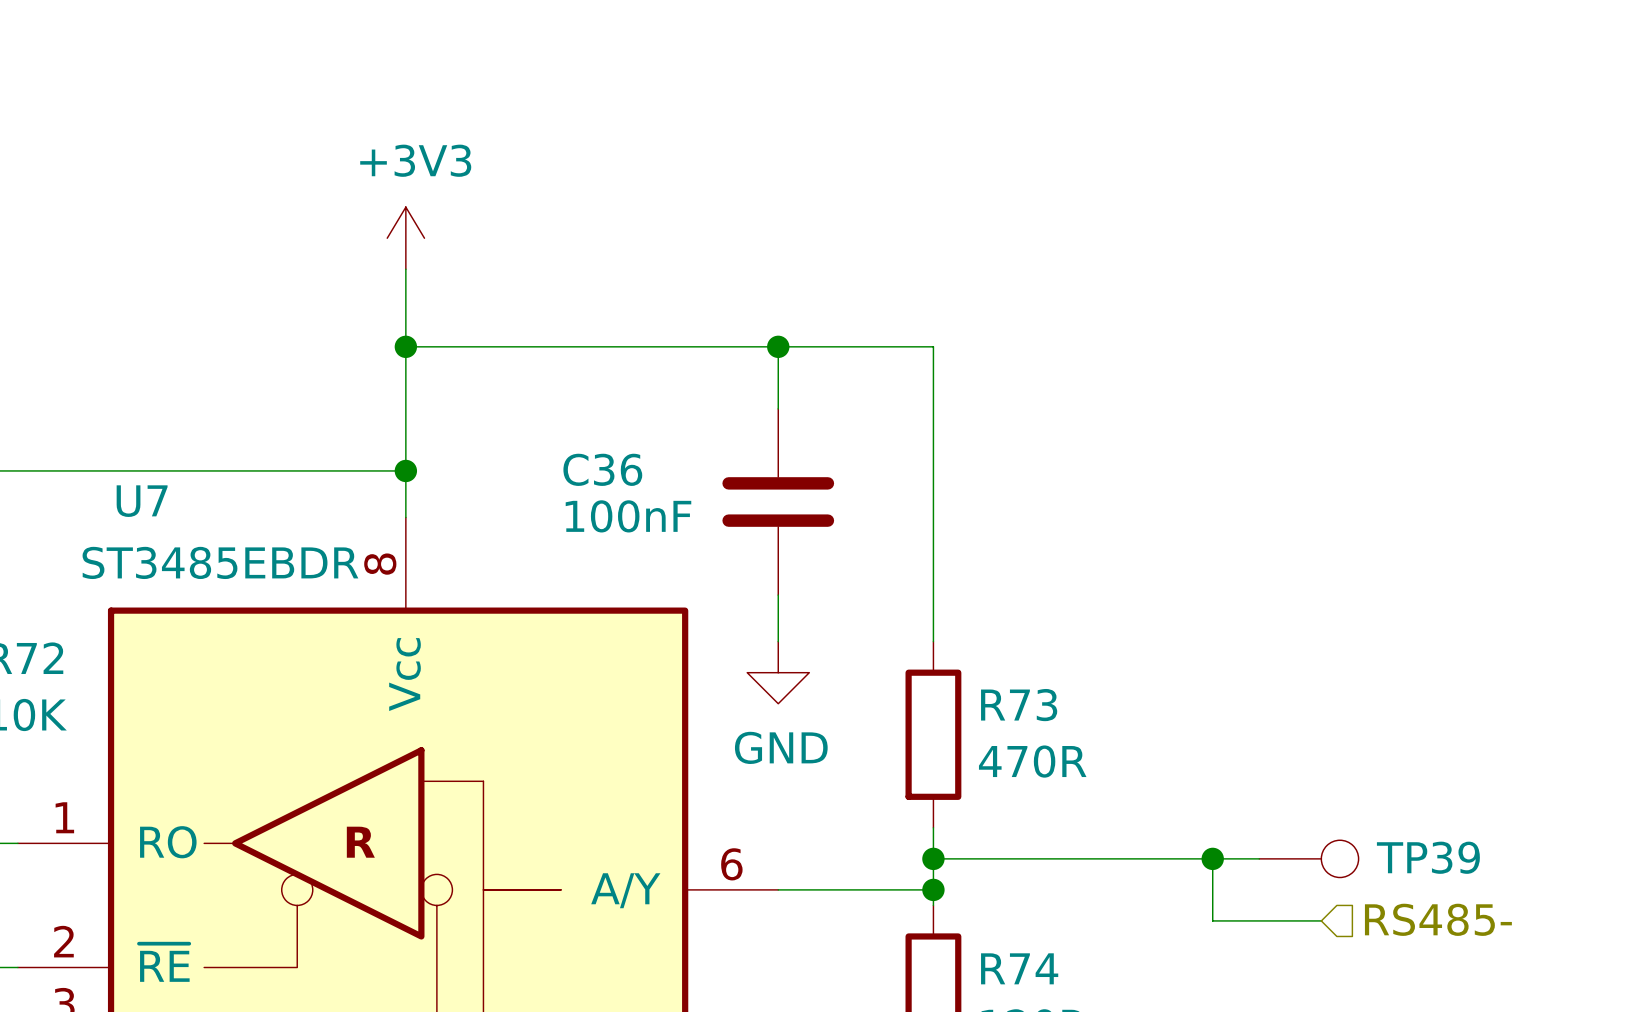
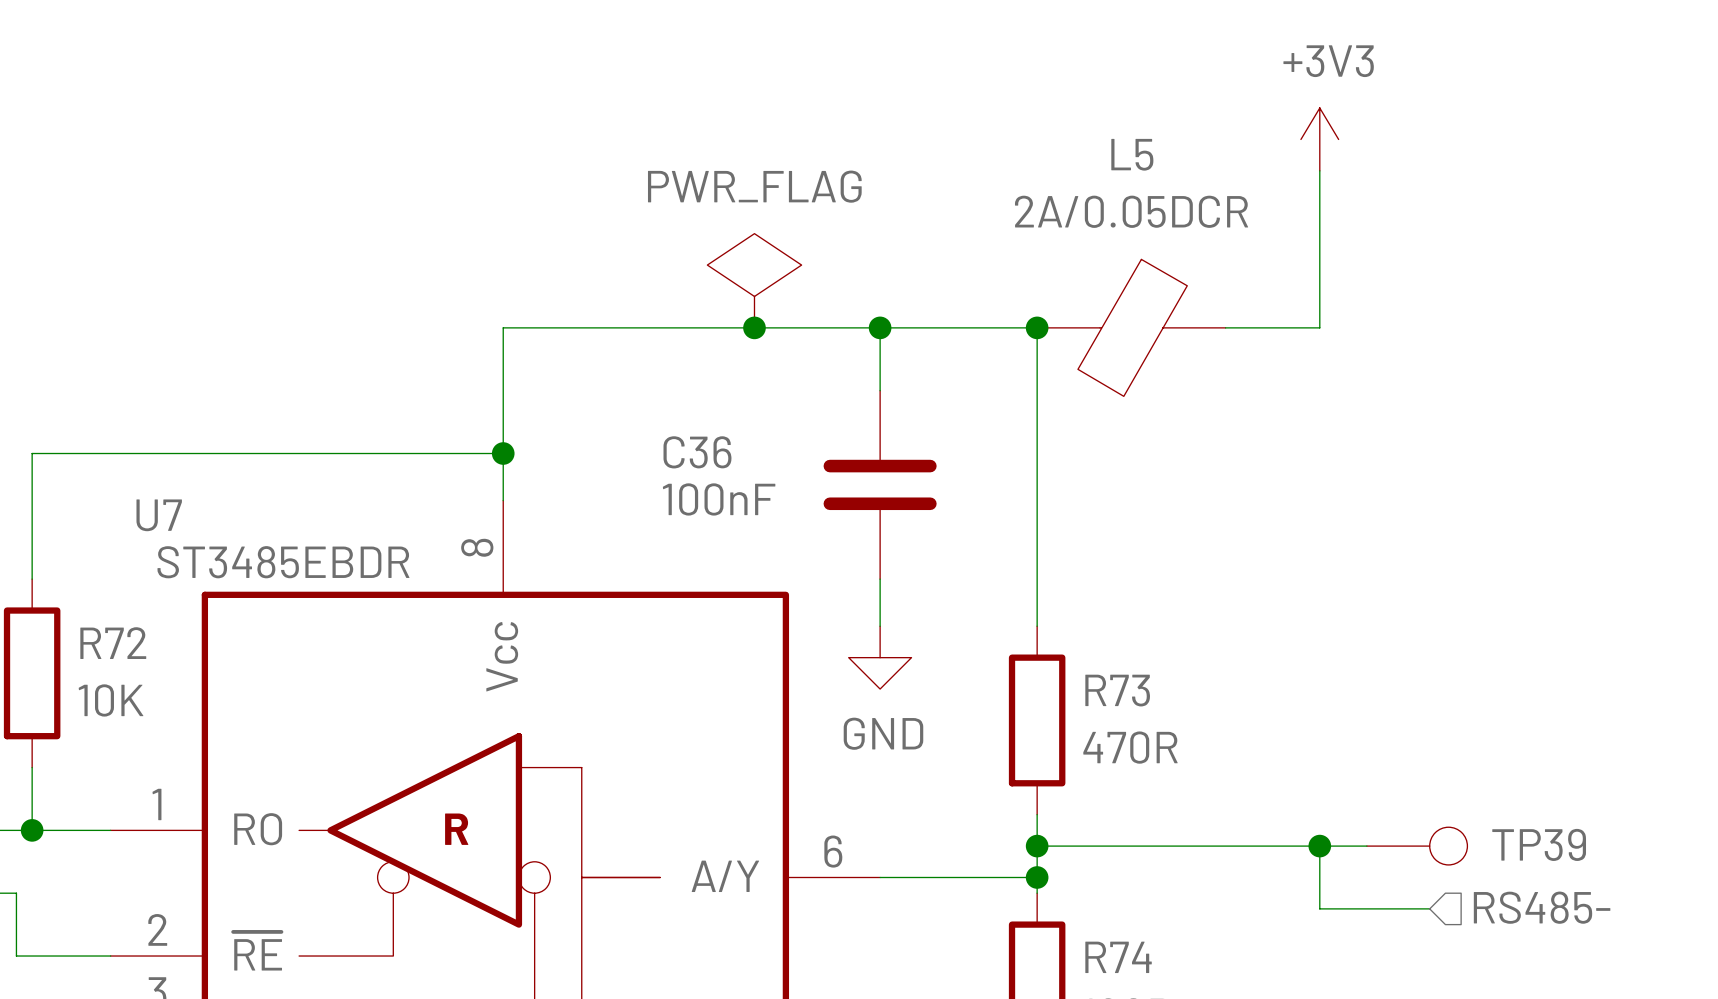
power symbol: none -> +3V3 (1319, 139)
wire: none -> (1319, 170) (1319, 327) (1225, 327)
power symbol: +3V3 (405, 238) -> none
wire: (405, 269) (405, 346) -> none
power symbol: none -> PWR_FLAG (754, 280)
junction: (405, 346) -> none
junction: none -> (754, 327)
junction: none -> (1037, 327)
L5: none -> 2A/0.05DCR (1131, 327)
U7 name position: U7 (142, 501) -> U7 (159, 515)
U7 value position: ST3485EBDR (220, 562) -> ST3485EBDR (283, 562)

